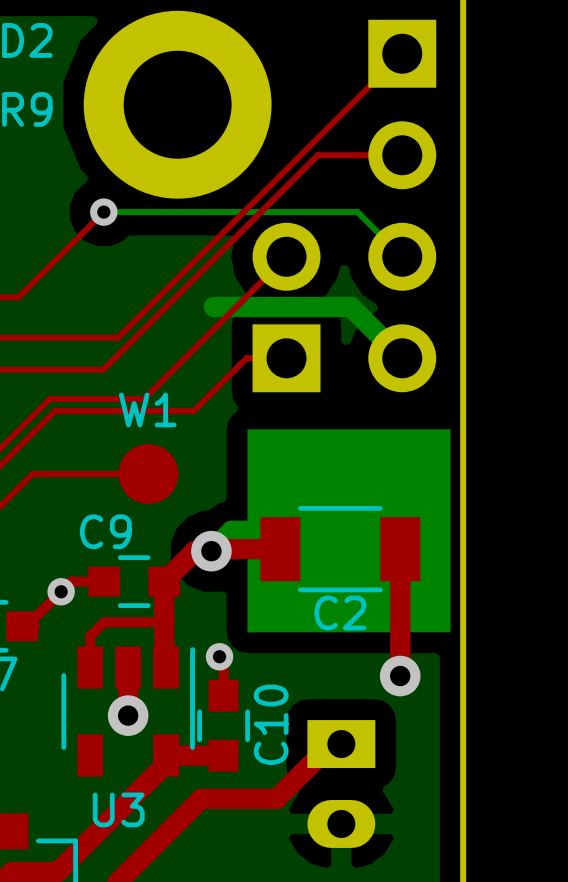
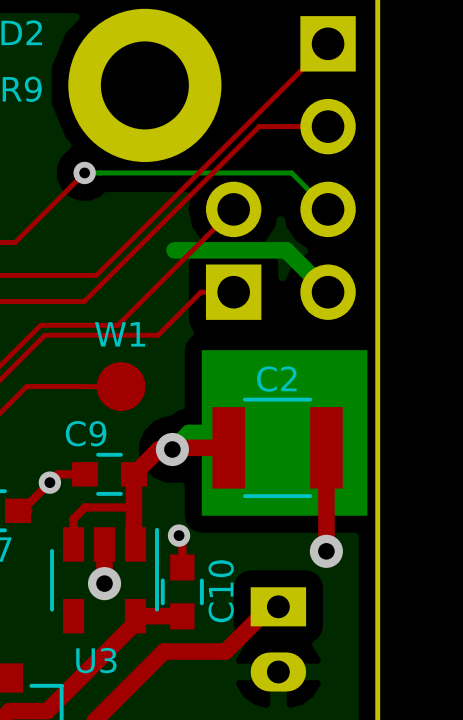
C2 footprint: [260, 505, 421, 593] -> [212, 397, 343, 499]
C2 name position: C2 (340, 612) -> C2 (276, 379)

